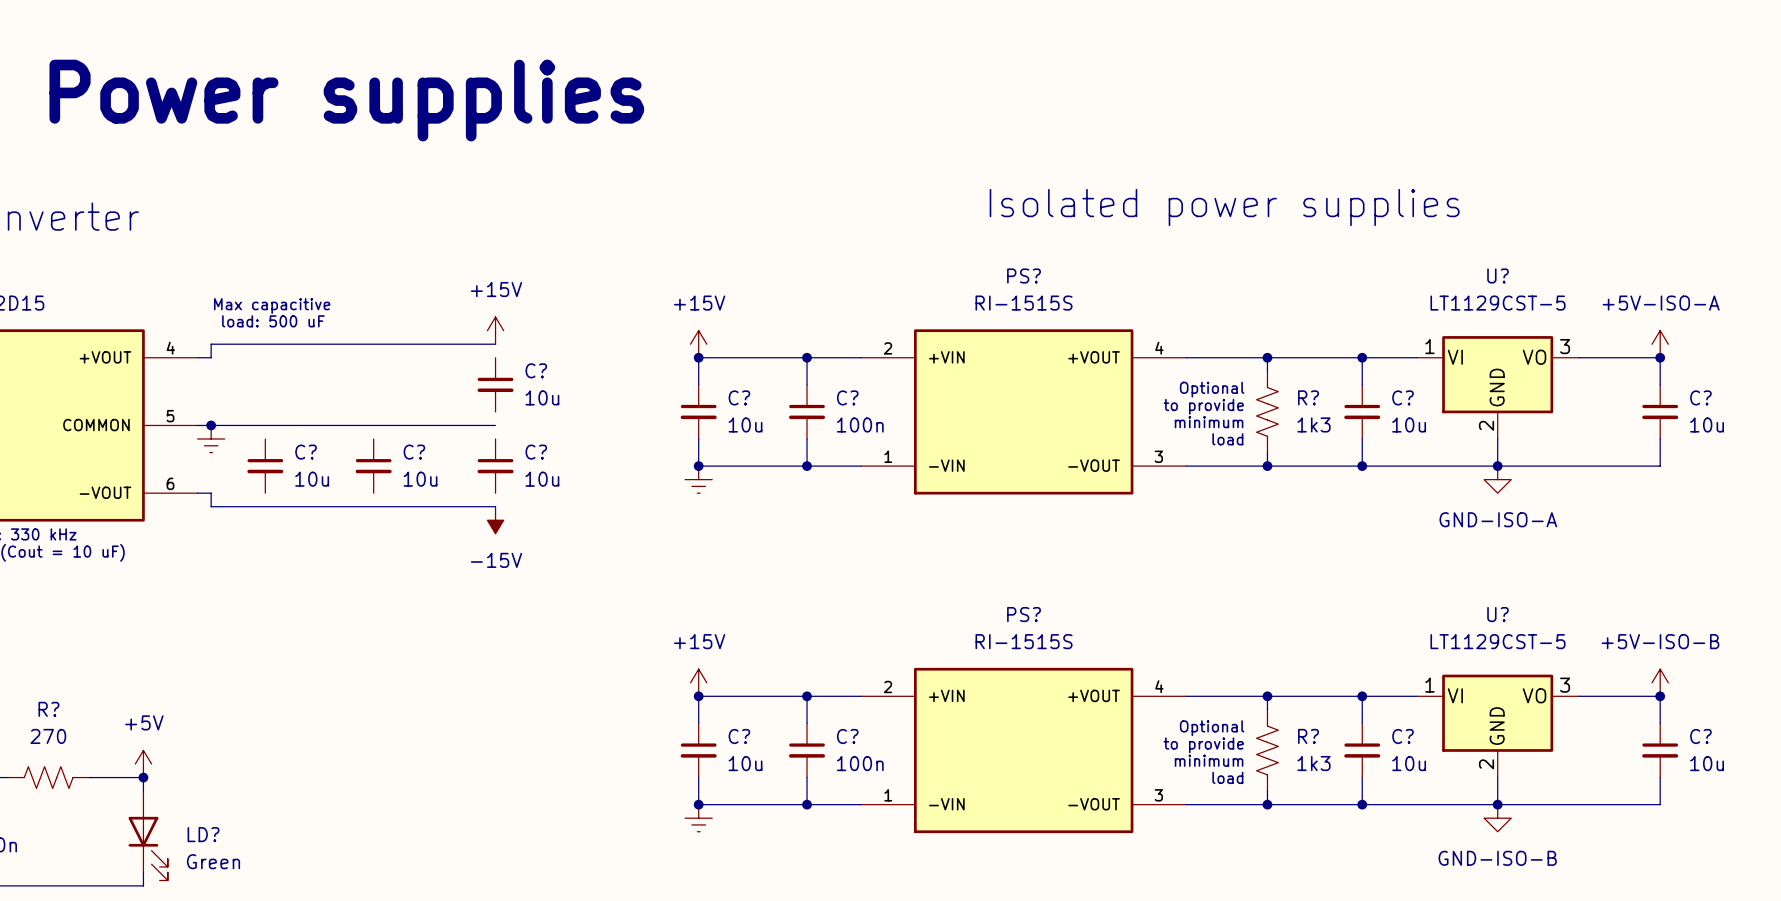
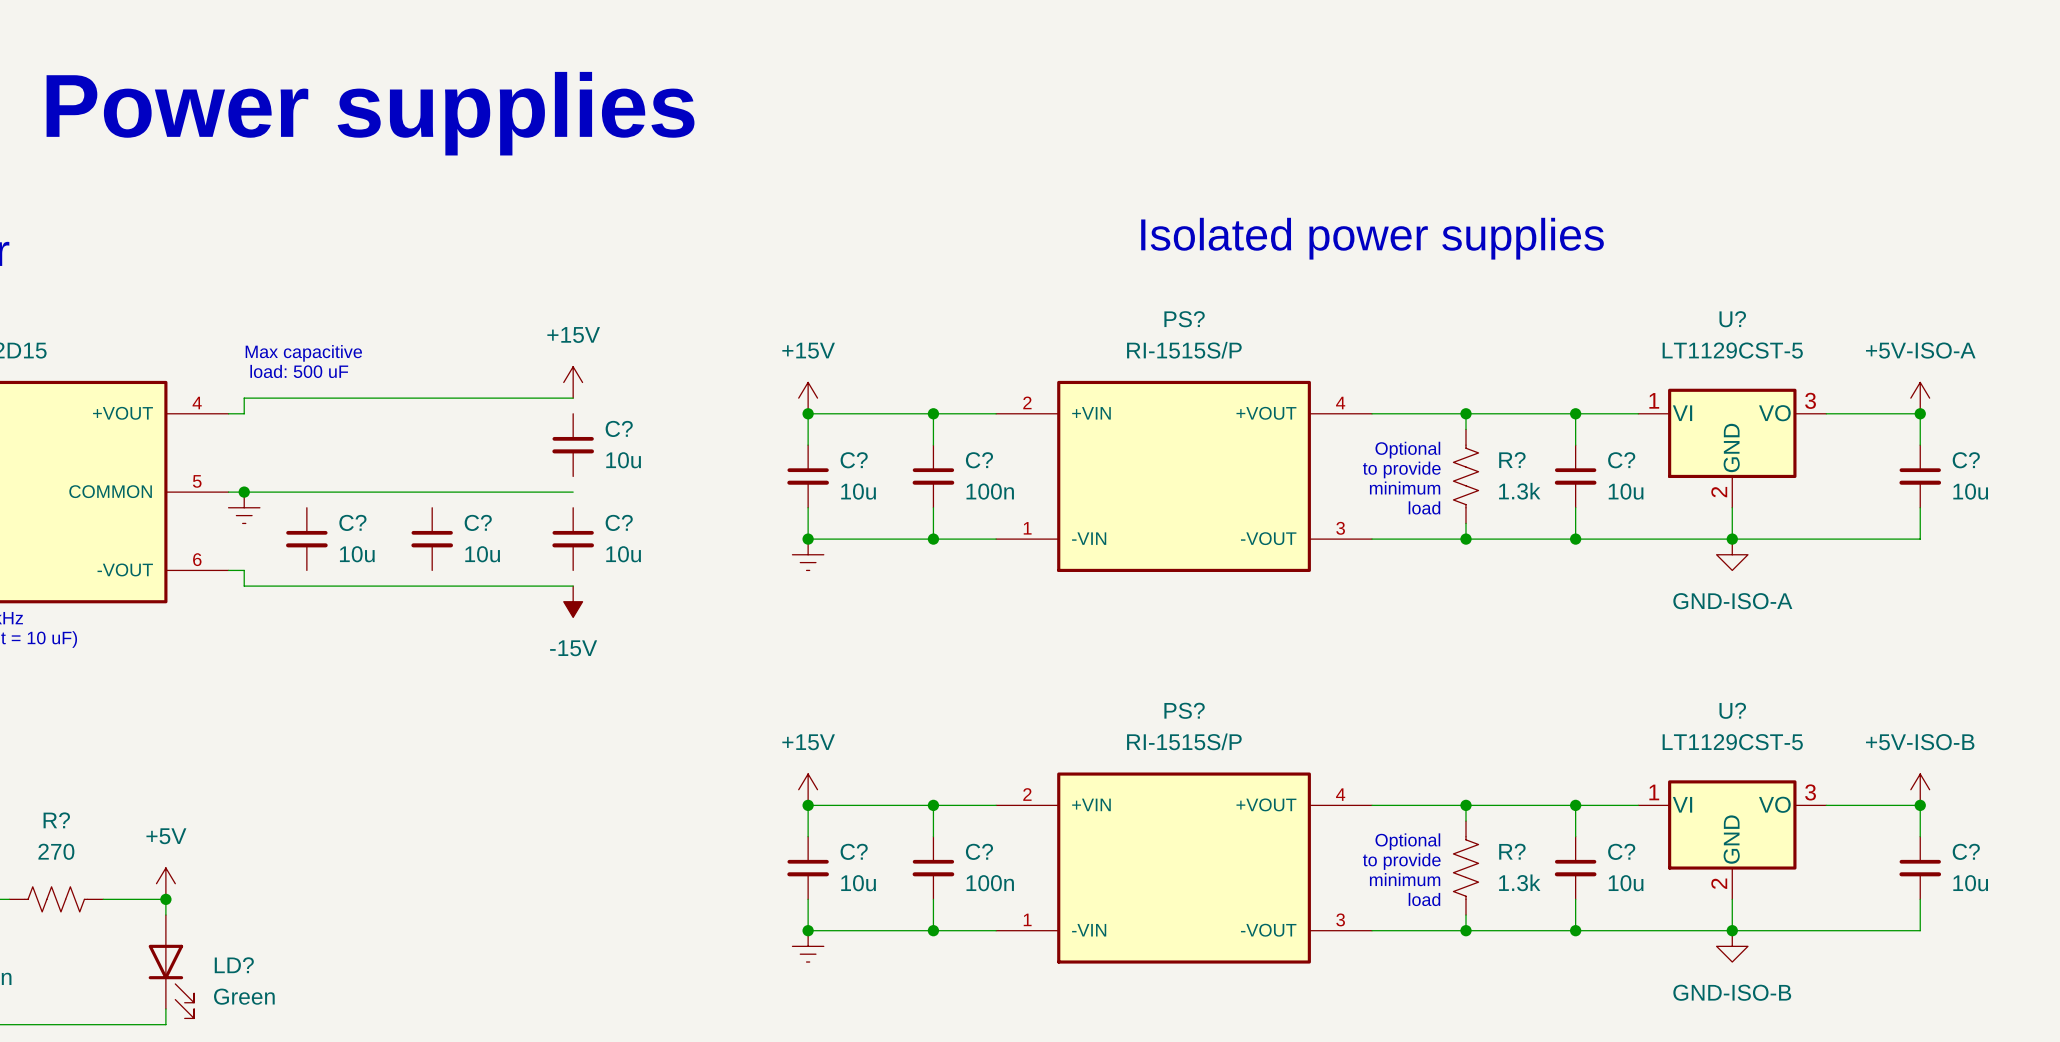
PS? value: RI-1515S (1024, 303) -> RI-1515S/P (1184, 350)
R? value: 1k3 (1313, 424) -> 1.3k (1519, 491)
PS? value: RI-1515S (1024, 641) -> RI-1515S/P (1184, 741)
R? value: 1k3 (1313, 763) -> 1.3k (1519, 882)

